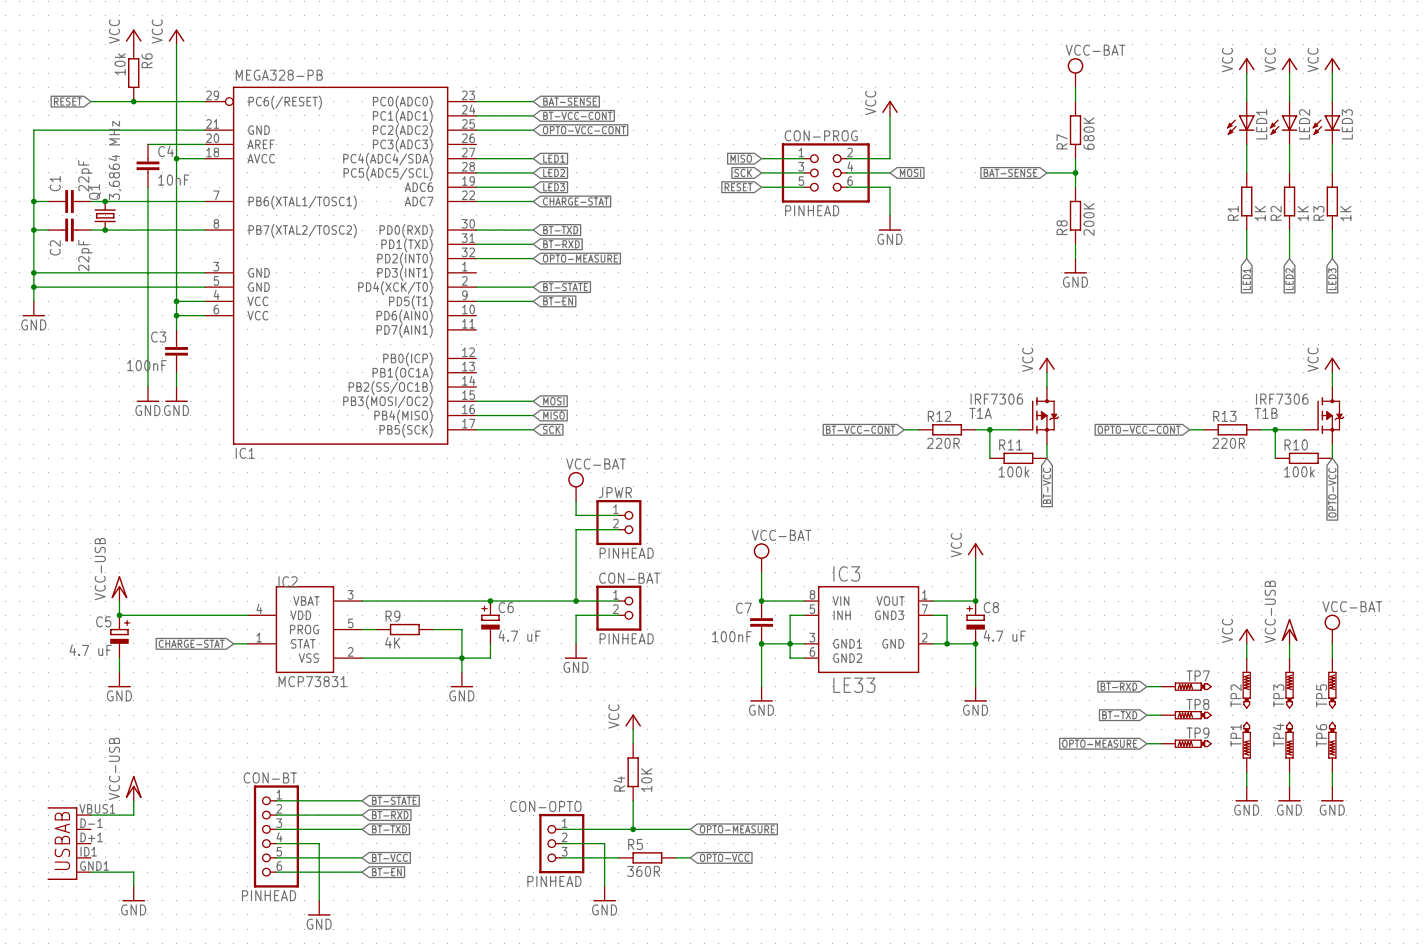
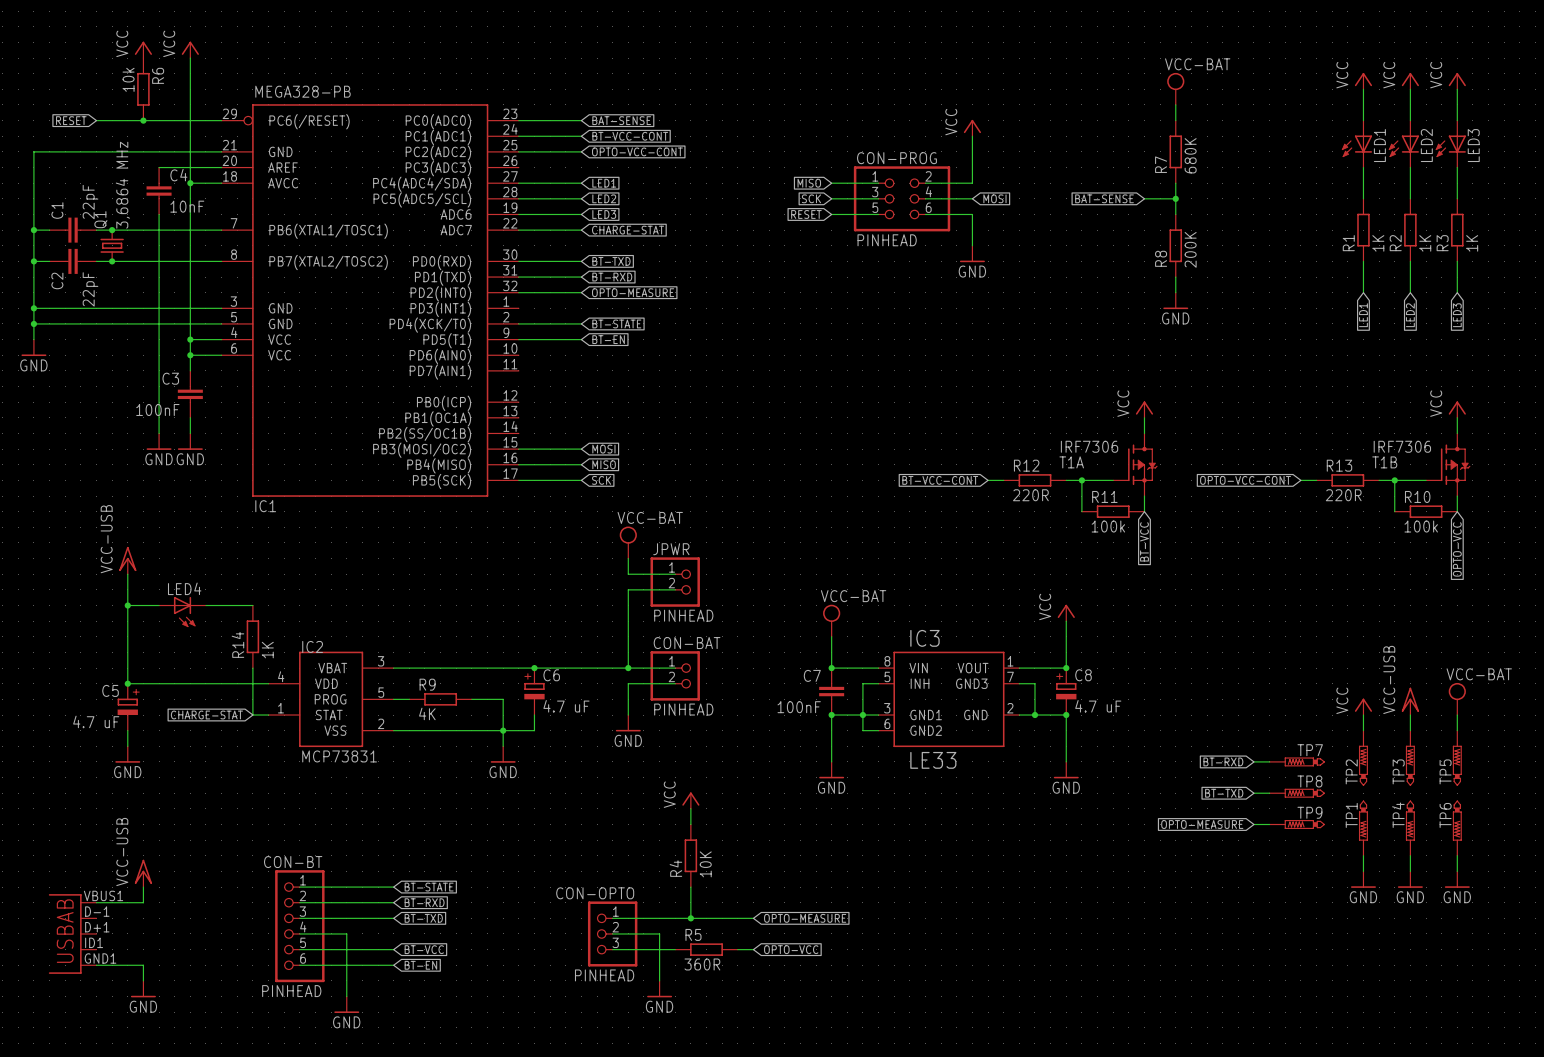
wire: none -> (127, 574) (127, 668)
wire: none -> (127, 605) (159, 605)
junction: none -> (127, 605)
wire: none -> (205, 605) (252, 605)
LED4: none -> (182, 612)
R14: none -> 1K (252, 636)
power symbol position: VCC-USB (119, 588) -> VCC-USB (127, 560)
wire: none -> (252, 668) (252, 715)

